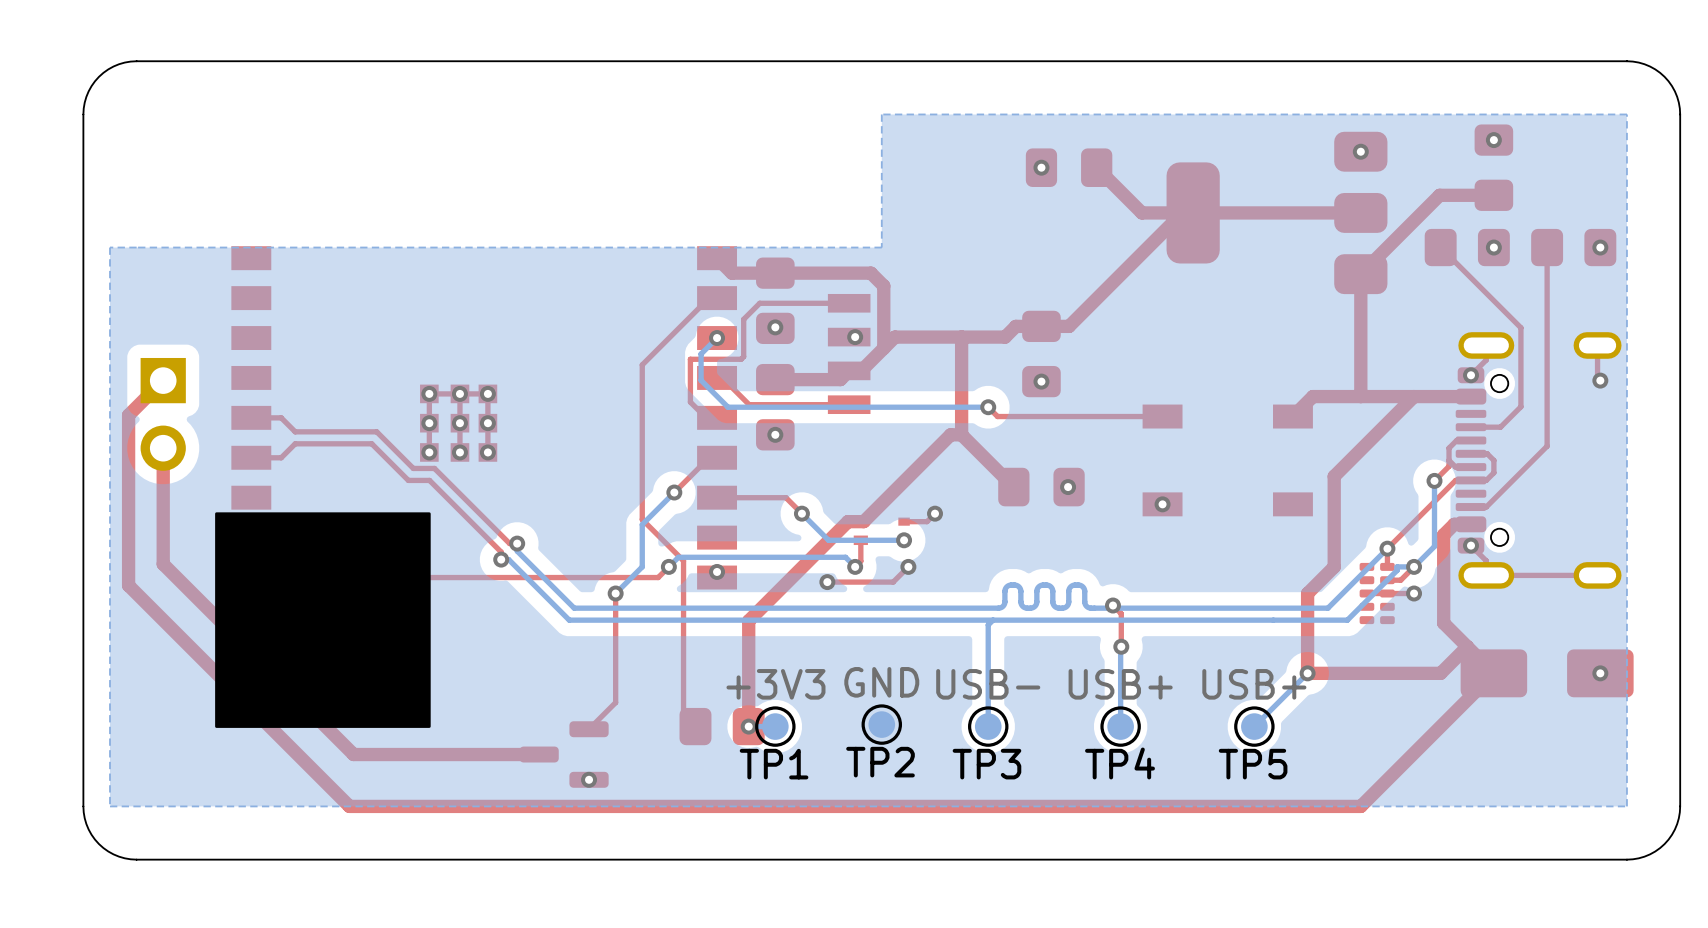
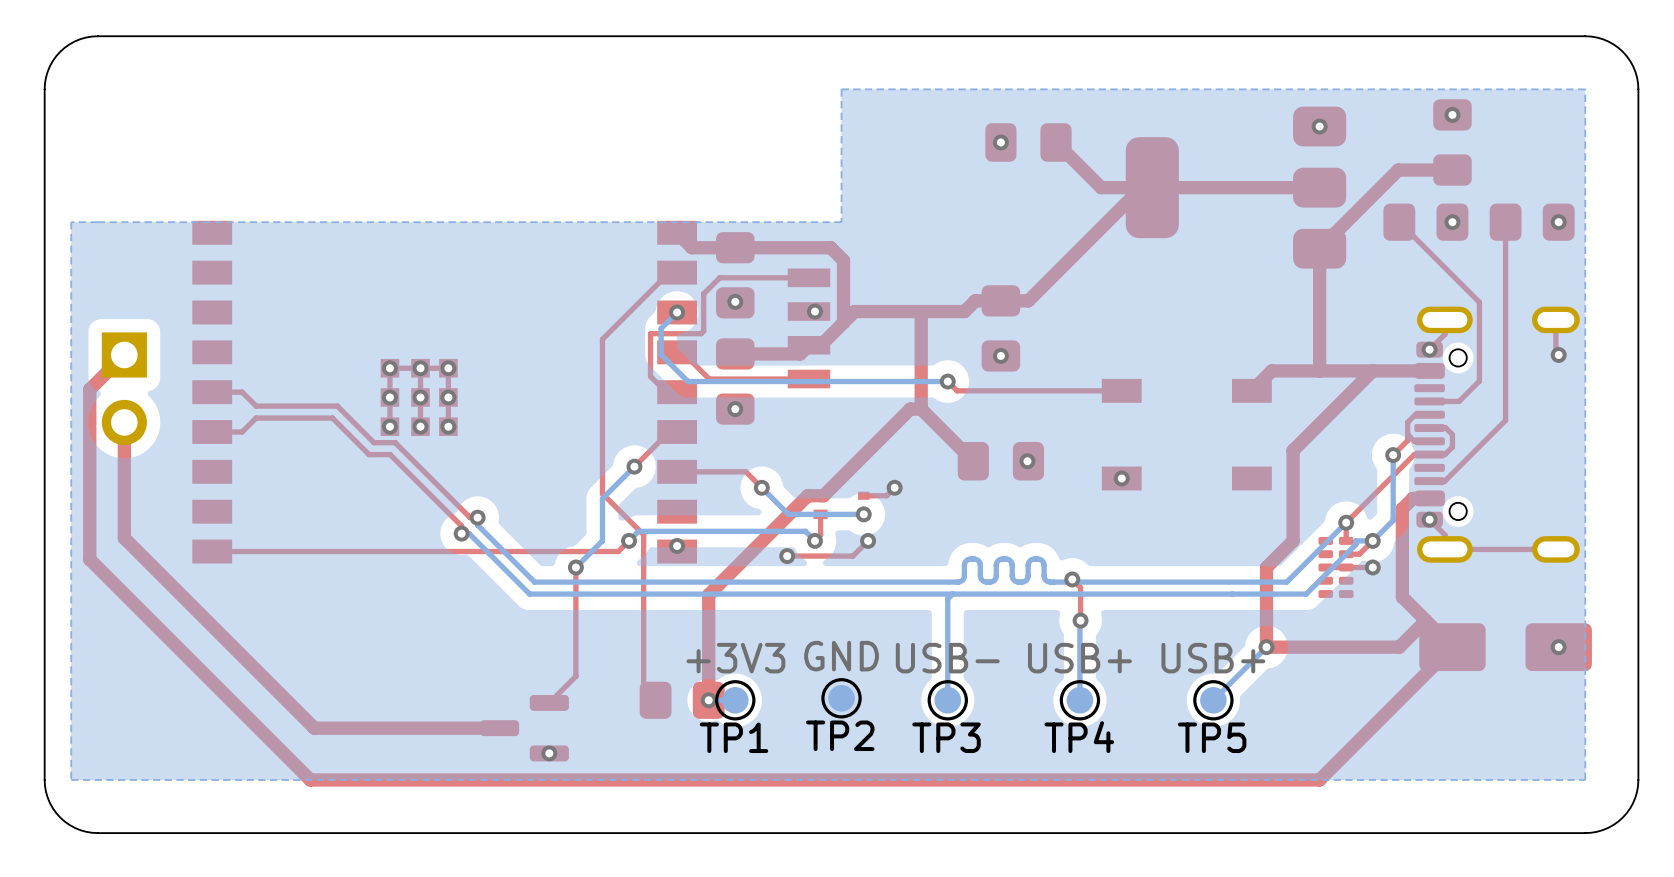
drawing: [215, 512, 431, 728] -> none

